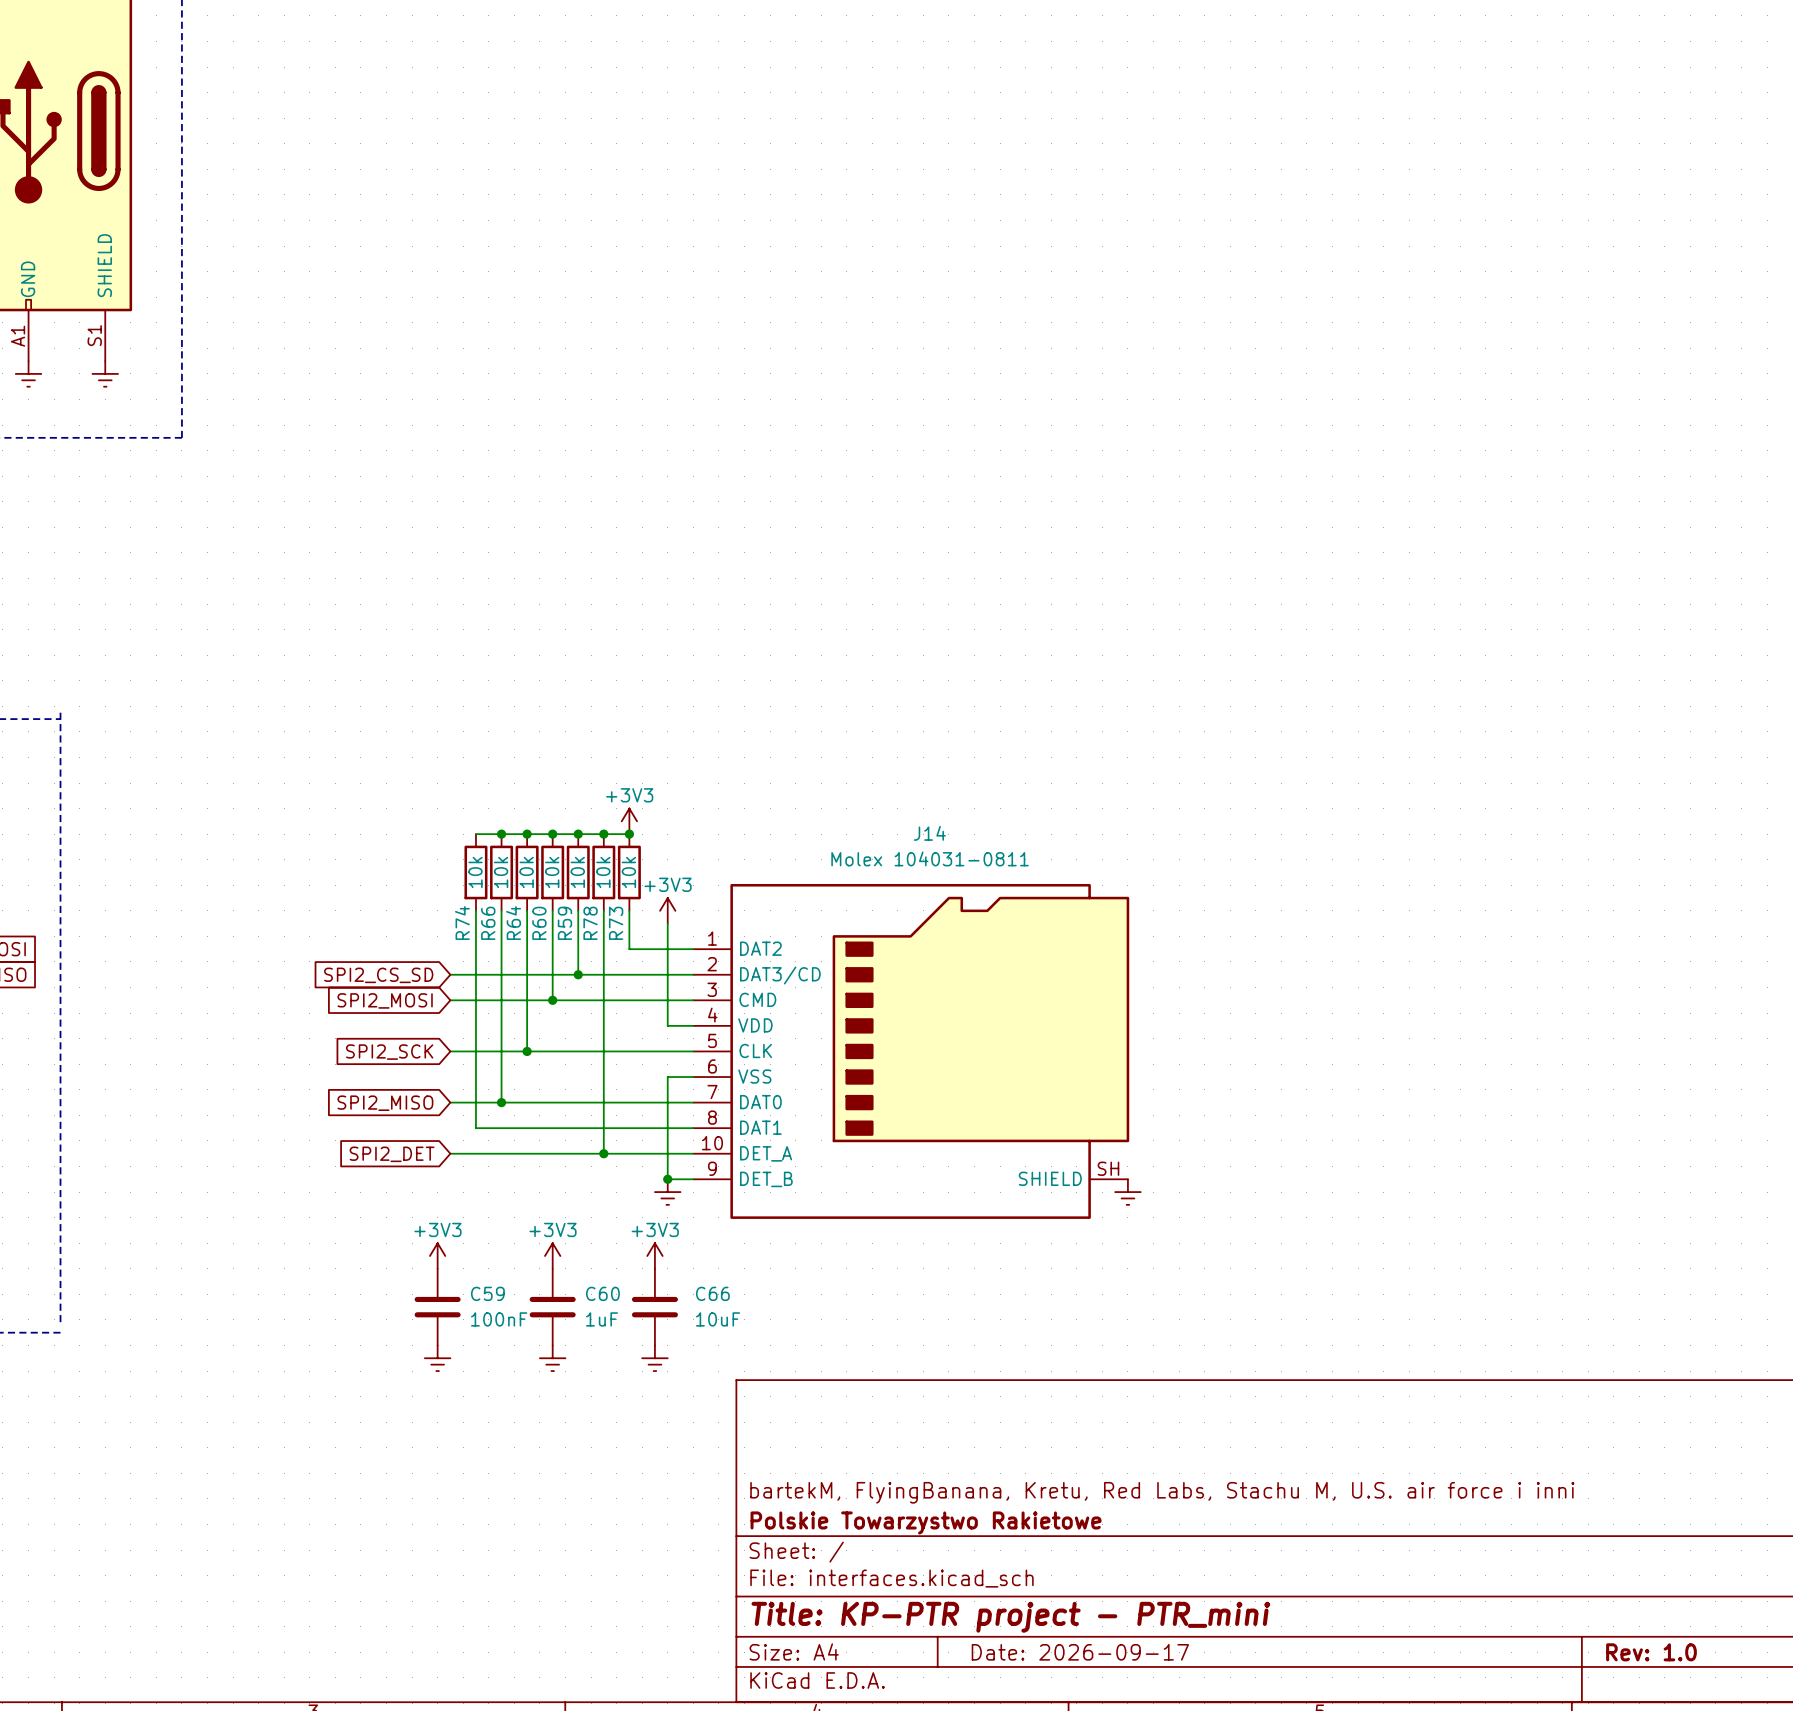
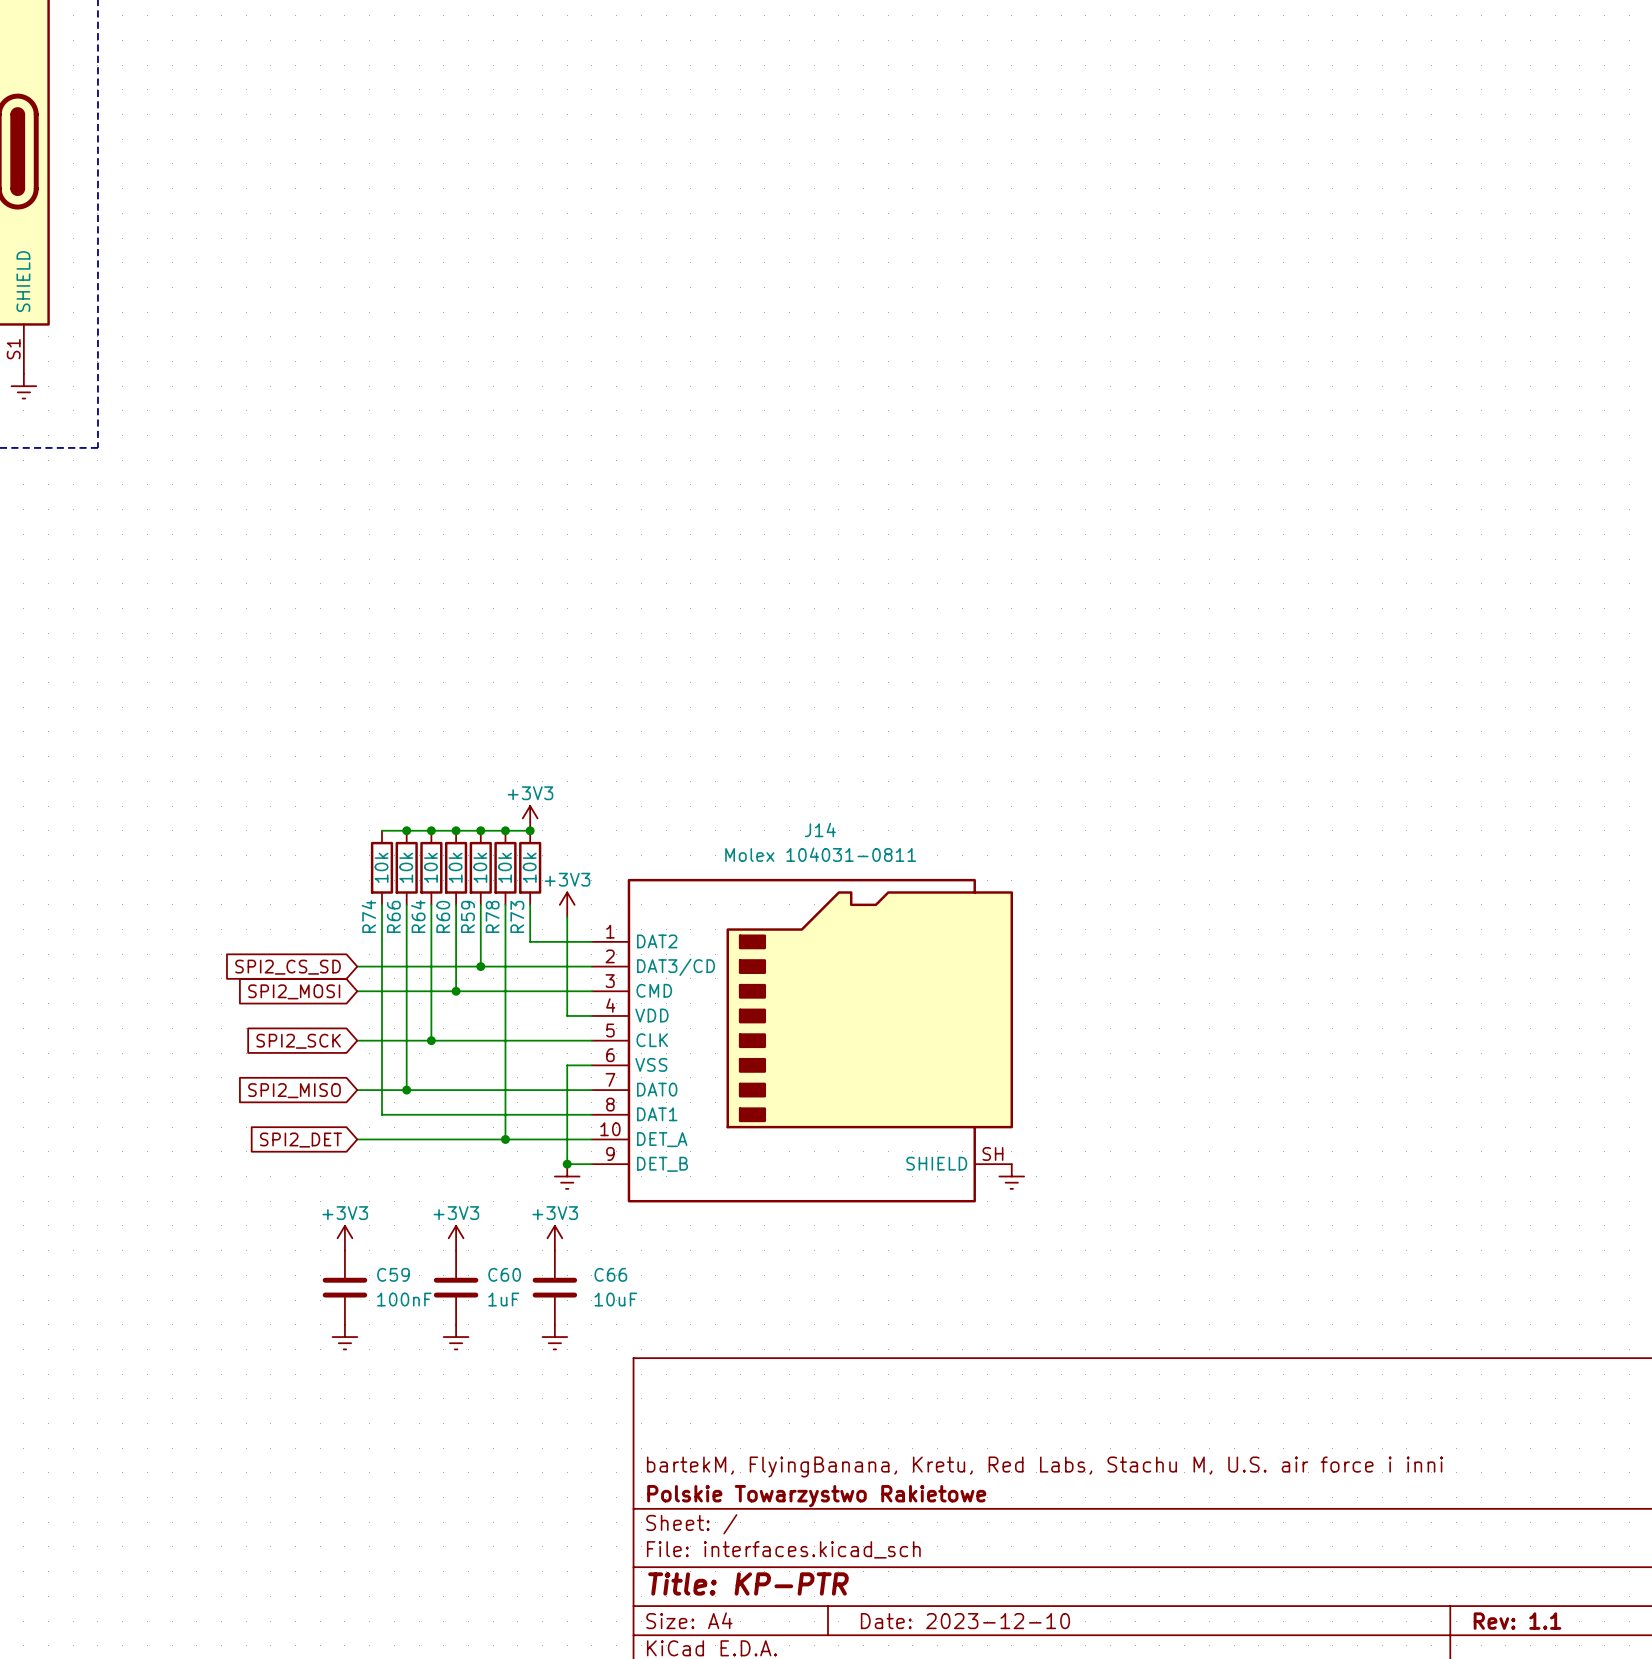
title block: Title: KP-PTR project - PTR_mini (1010, 1617) -> Title: KP-PTR (748, 1583)
title block: Date: 2026-09-17 (1080, 1652) -> Date: 2023-12-10 (965, 1621)
title block: Rev: 1.0 (1651, 1652) -> Rev: 1.1 (1517, 1621)

